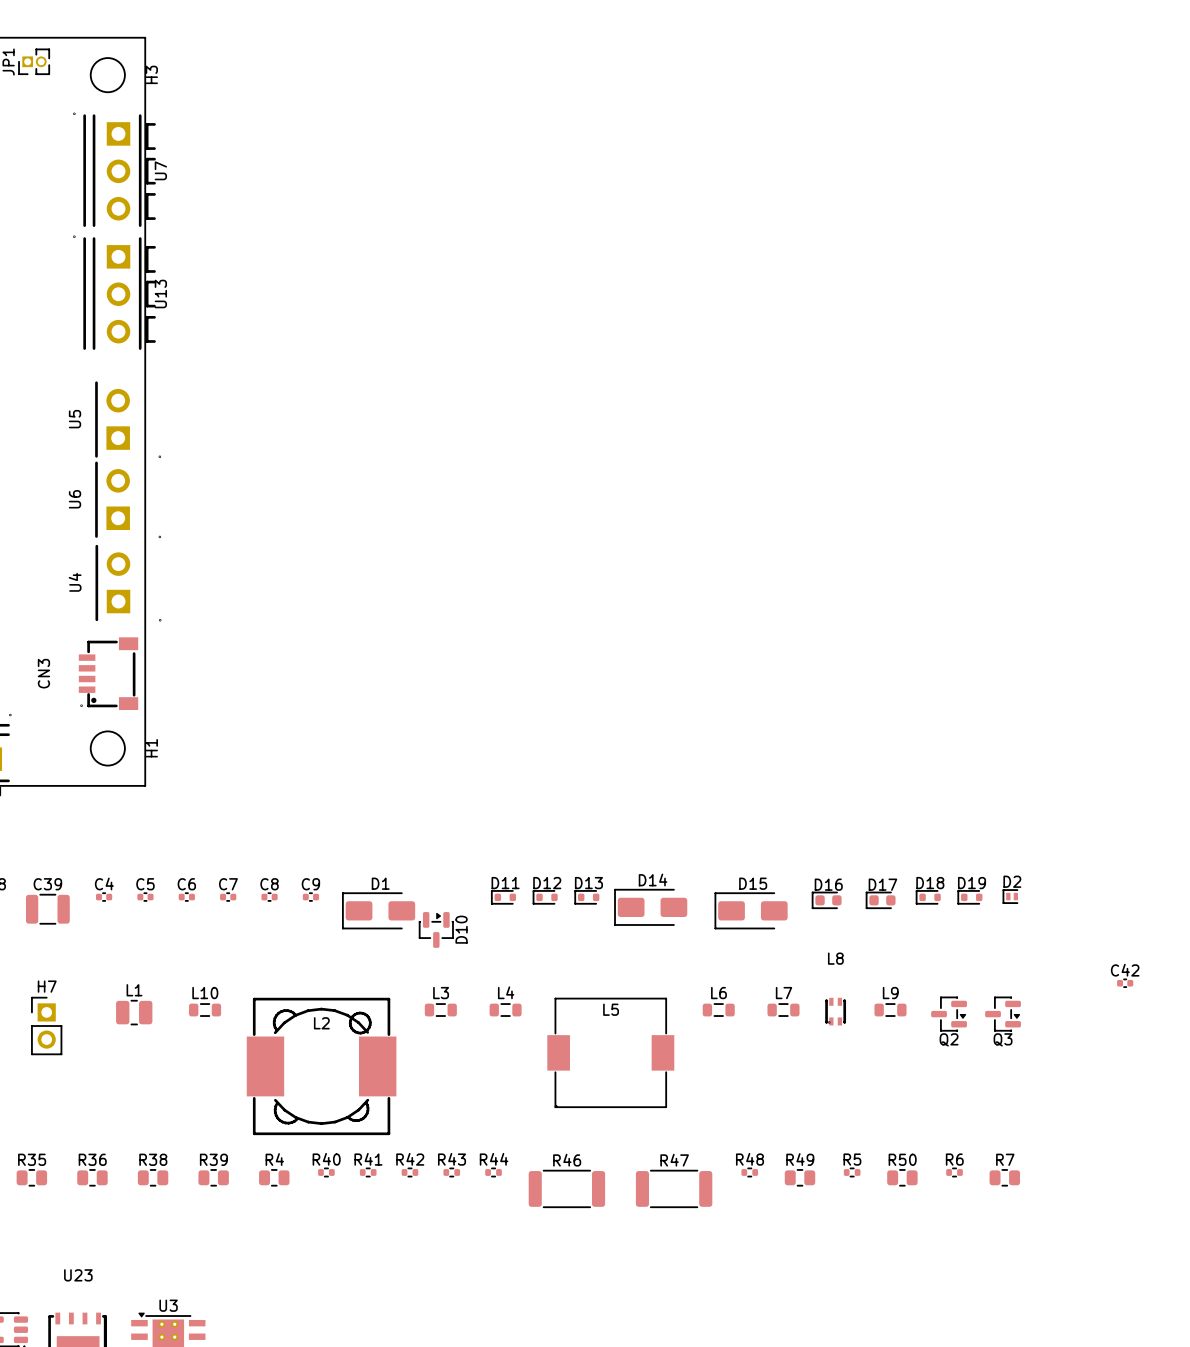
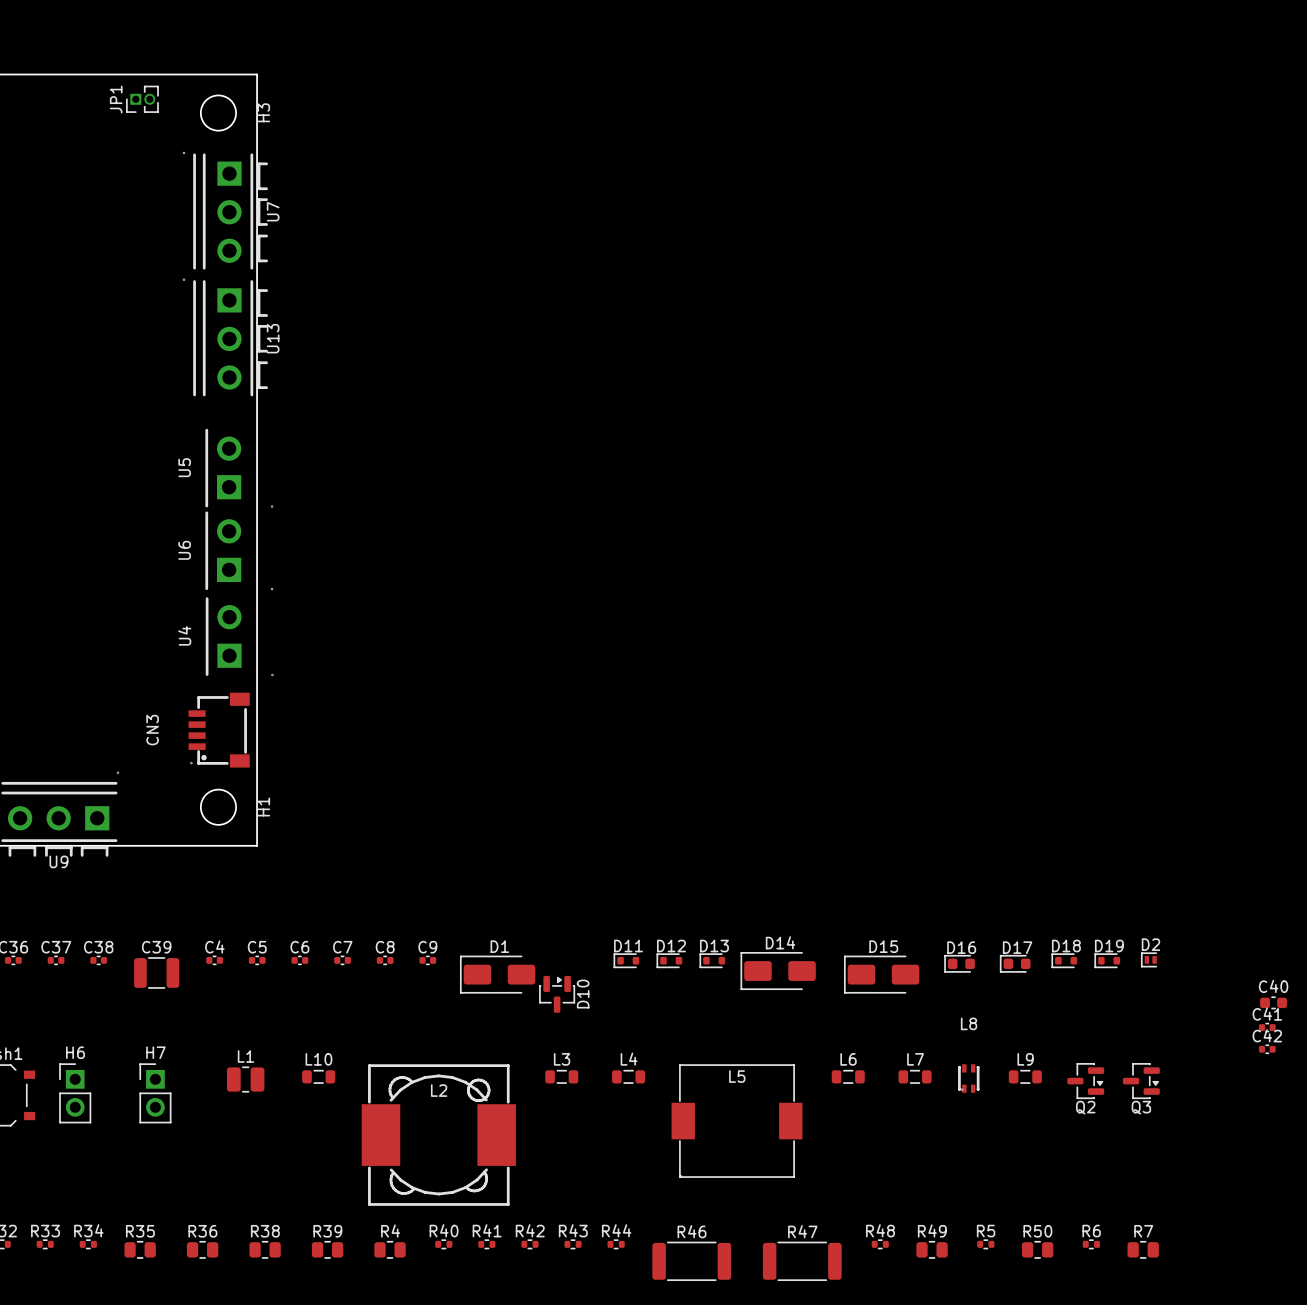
C40: none -> (1273, 1002)
C41: none -> (1267, 1027)

